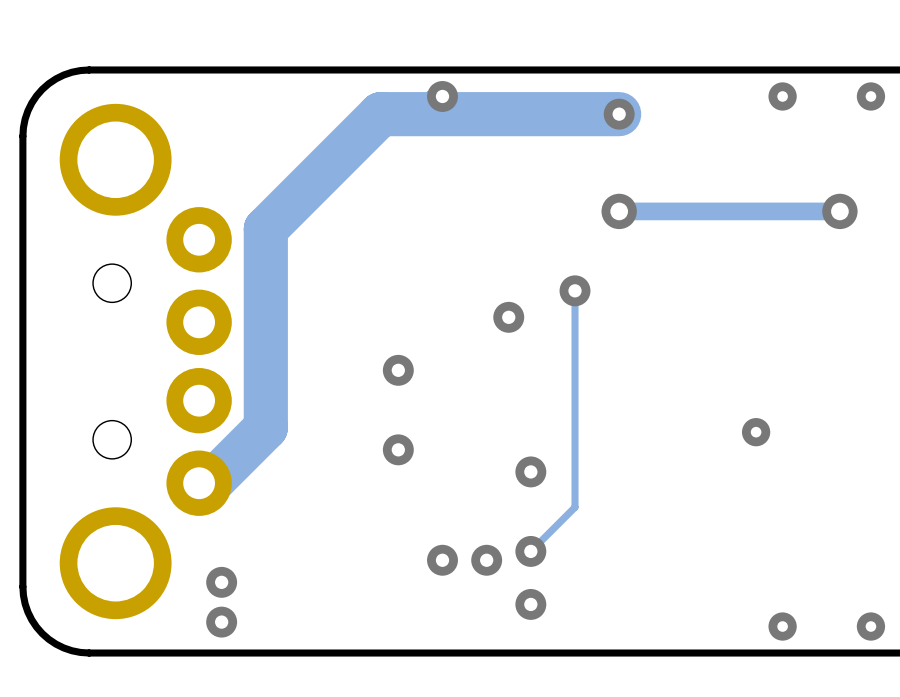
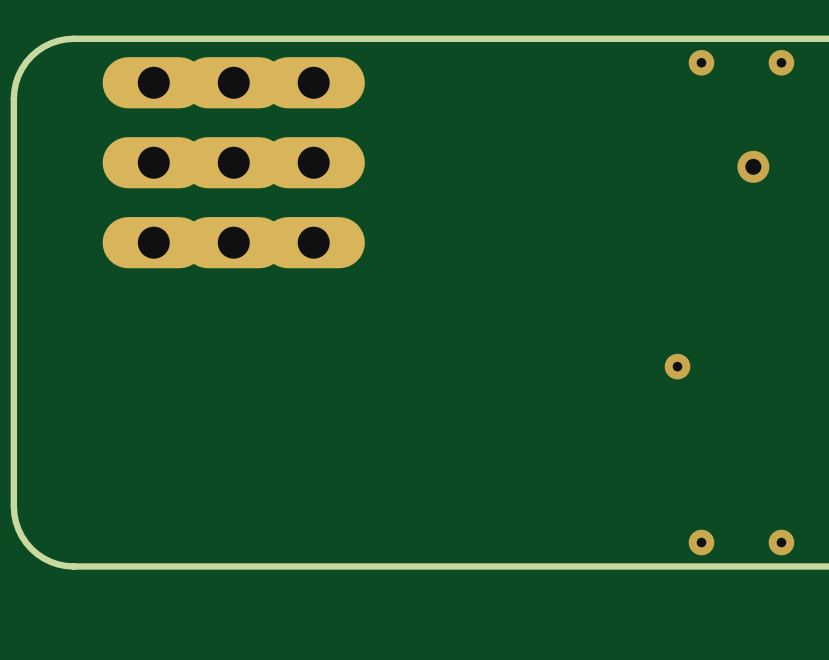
via: (442, 96) -> none
track: (619, 114) (380, 114) (265, 228) (265, 427) (210, 483) (199, 483) -> none
via: (619, 114) -> none
part: none -> (153, 162)
part: none -> (233, 162)
part: none -> (313, 162)
via: (619, 211) -> none
track: (839, 211) (619, 211) -> none
track: (575, 290) (575, 507) (530, 551) -> none
via: (575, 290) -> none
via: (508, 317) -> none
part: (145, 361) -> none
via: (398, 370) -> none
via: (398, 449) -> none
via: (530, 471) -> none
via: (530, 551) -> none
via: (442, 560) -> none
via: (486, 560) -> none
via: (221, 582) -> none
via: (530, 604) -> none
via: (221, 622) -> none

